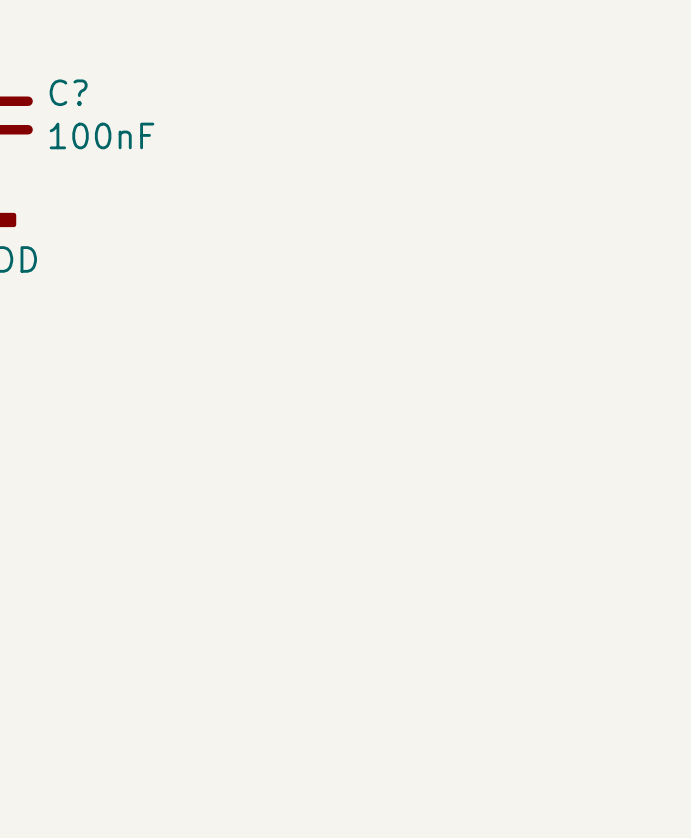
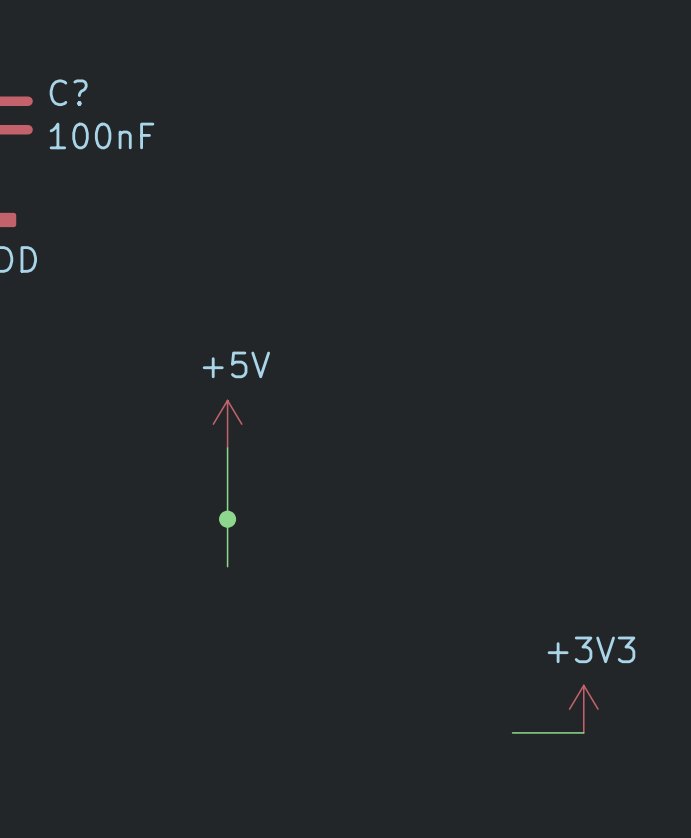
power symbol: none -> +5V (227, 424)
wire: none -> (227, 447) (227, 566)
junction: none -> (227, 519)
power symbol: none -> +3V3 (583, 709)
wire: none -> (512, 732) (583, 732)

